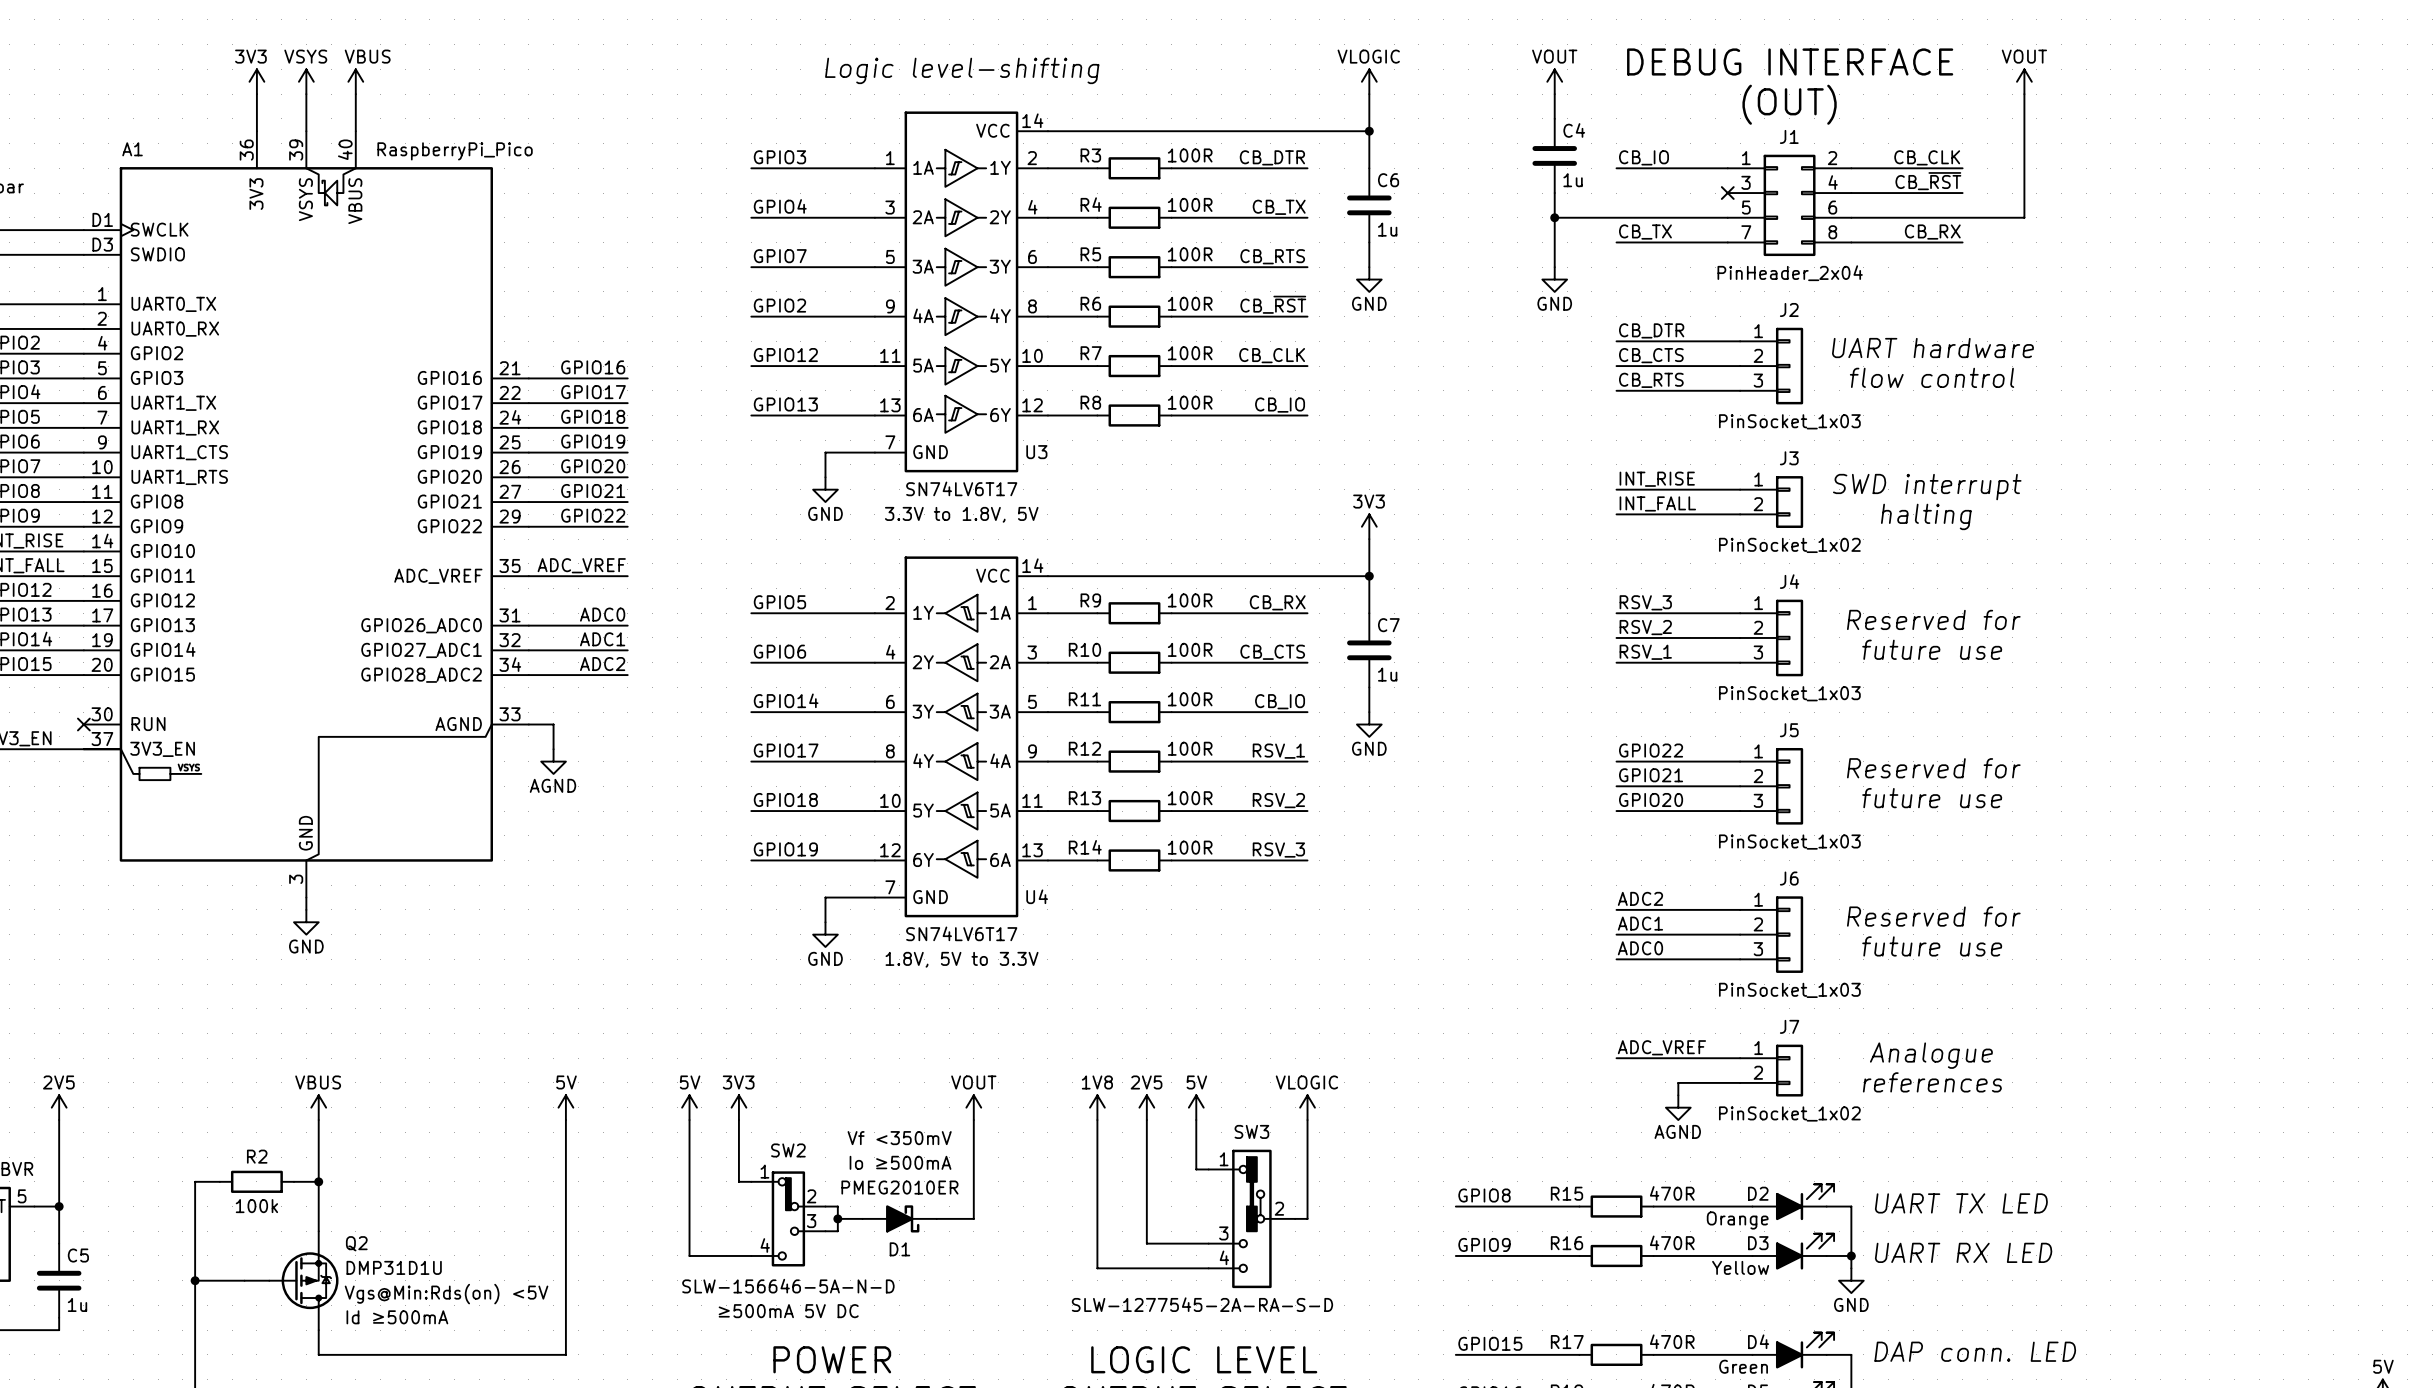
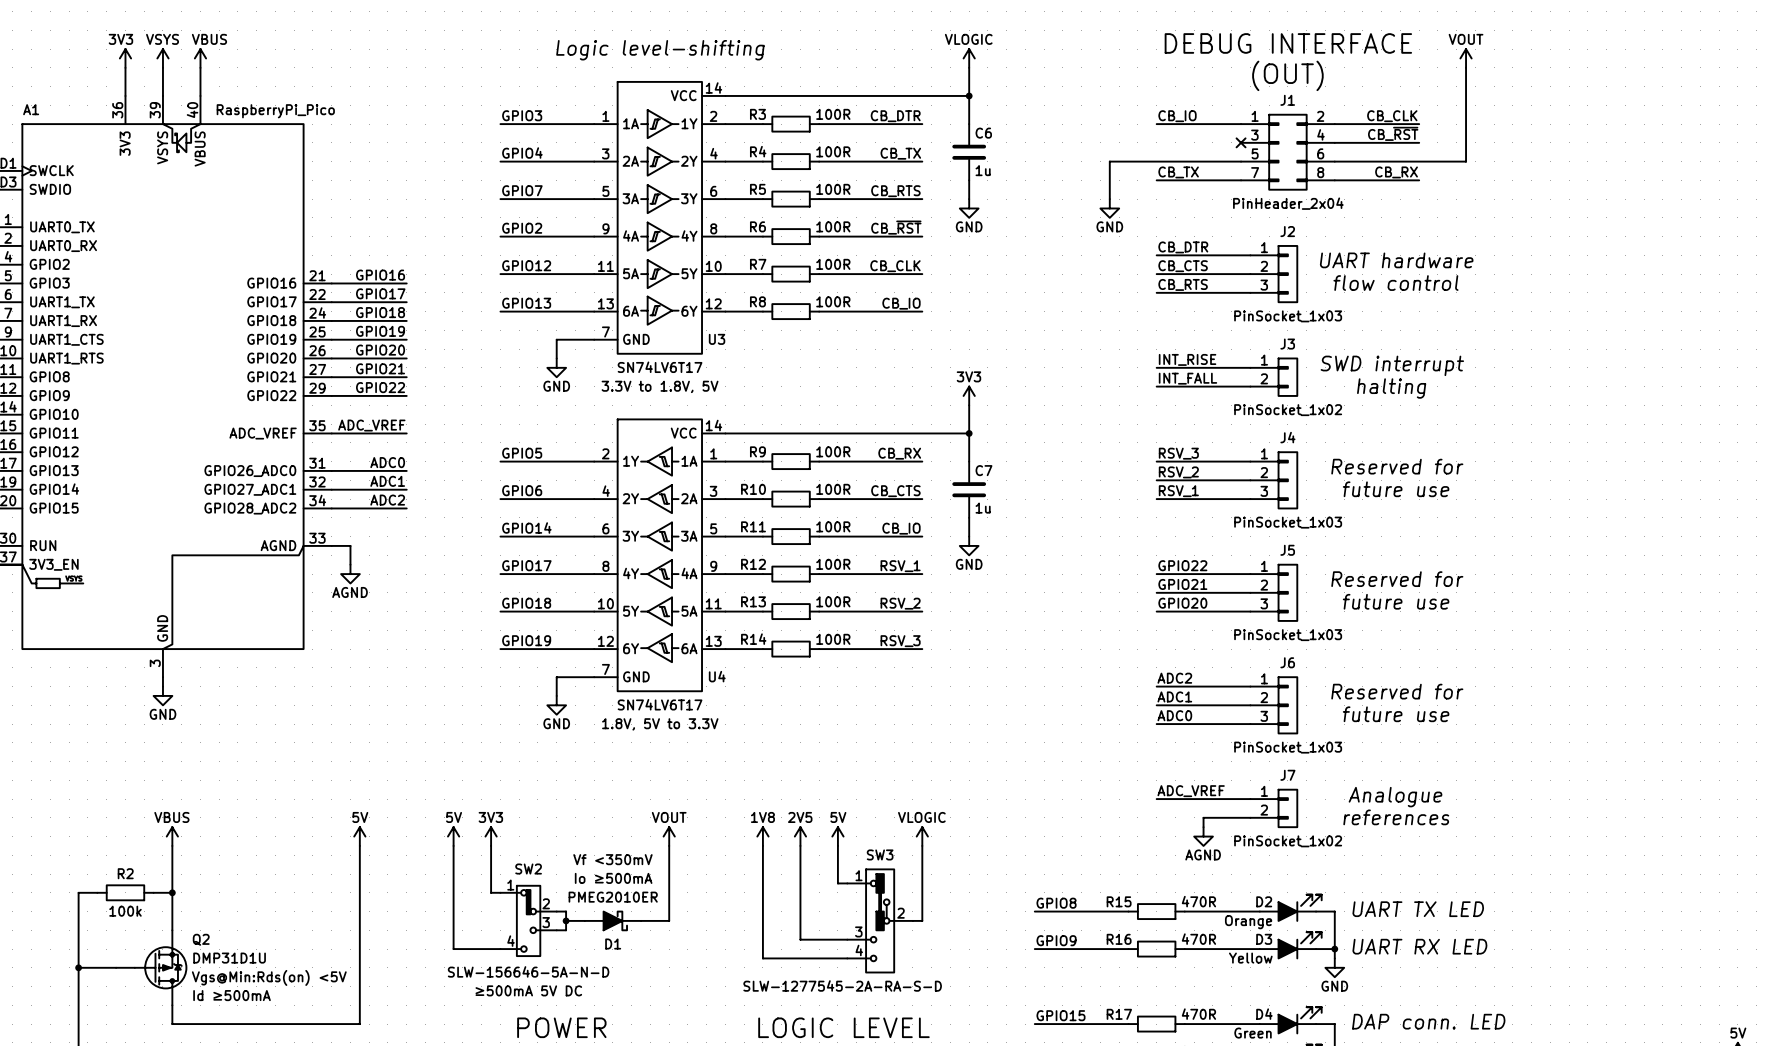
power symbol: VOUT (1554, 81) -> none
wire: (1554, 94) (1554, 118) -> none
C4: 1u (1554, 155) -> none
wire: (1554, 193) (1554, 217) -> none
junction: (1554, 217) -> none

